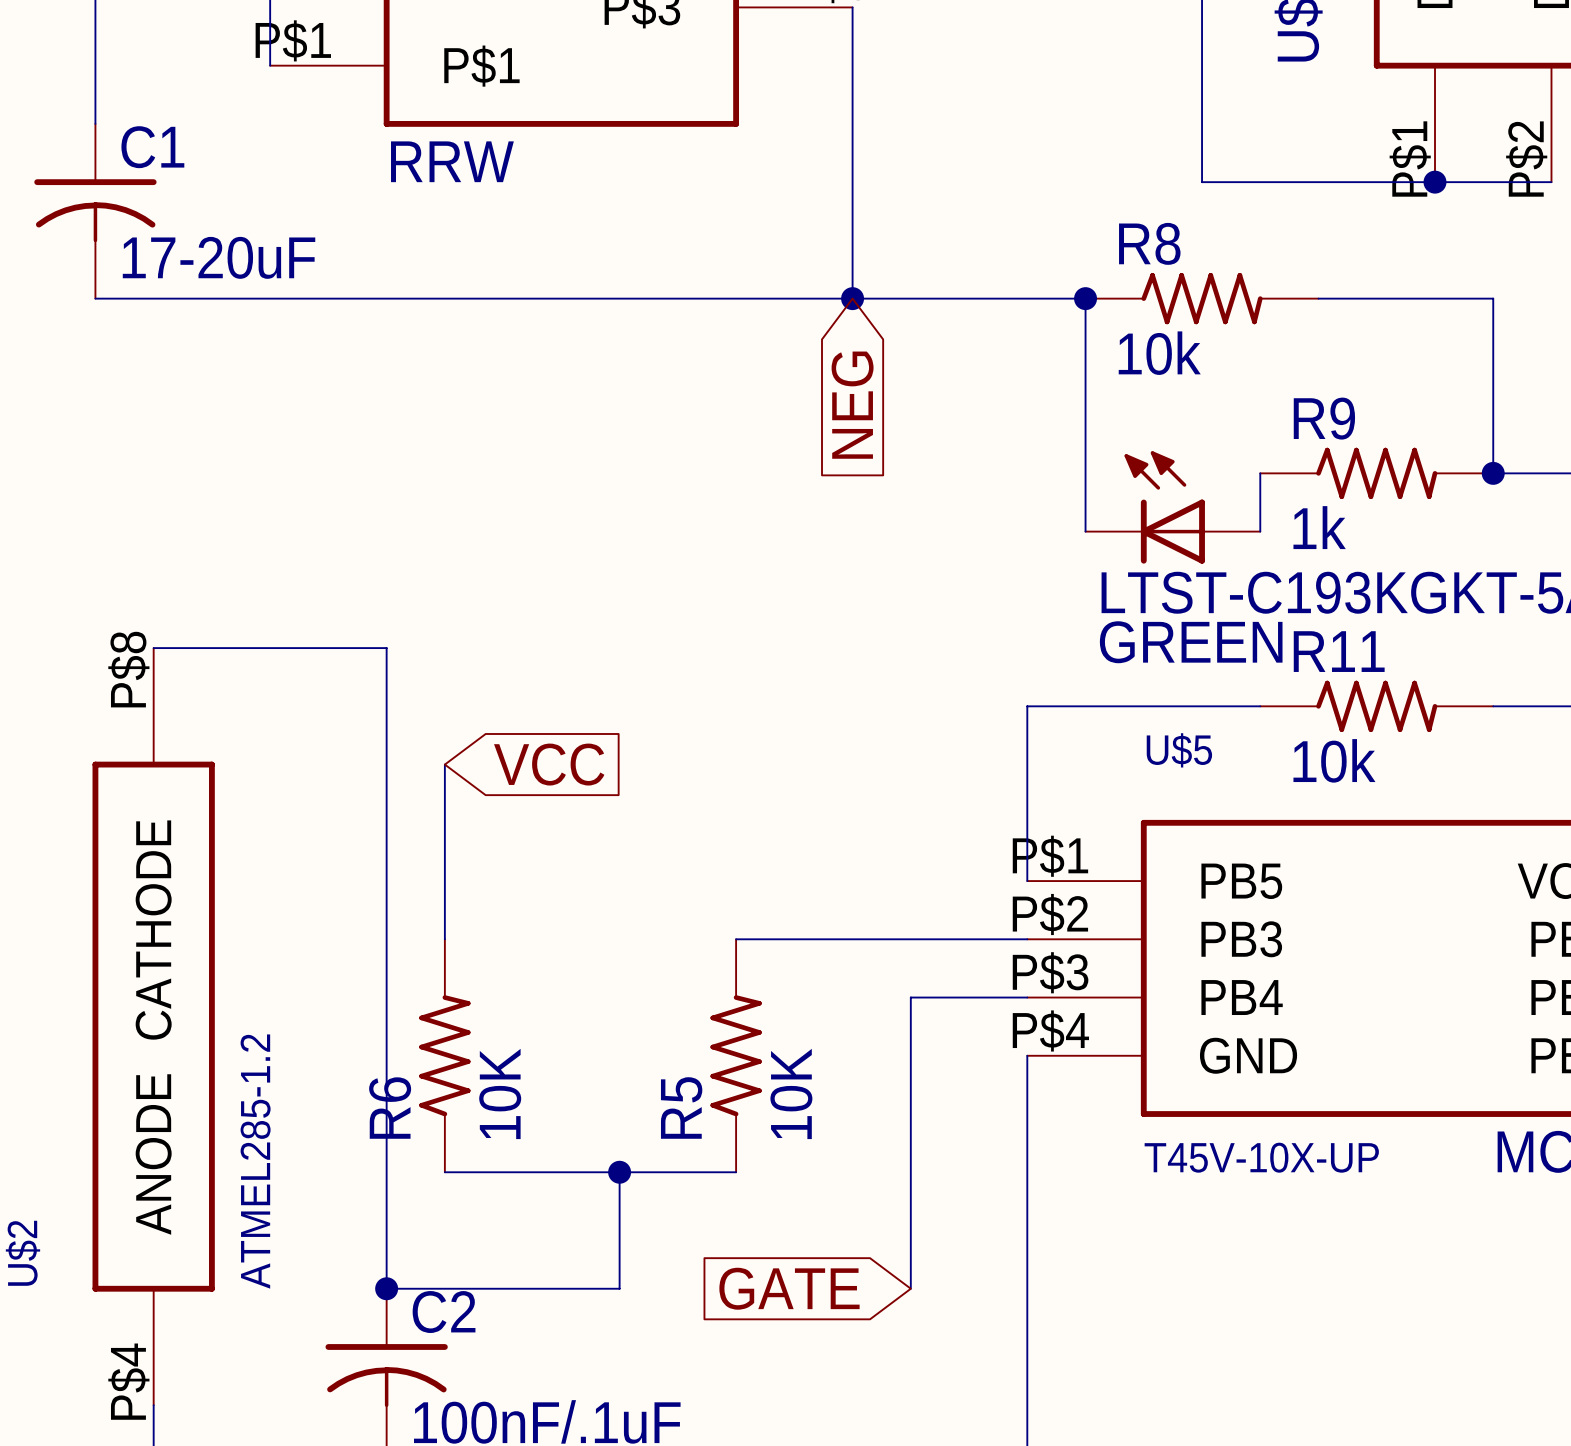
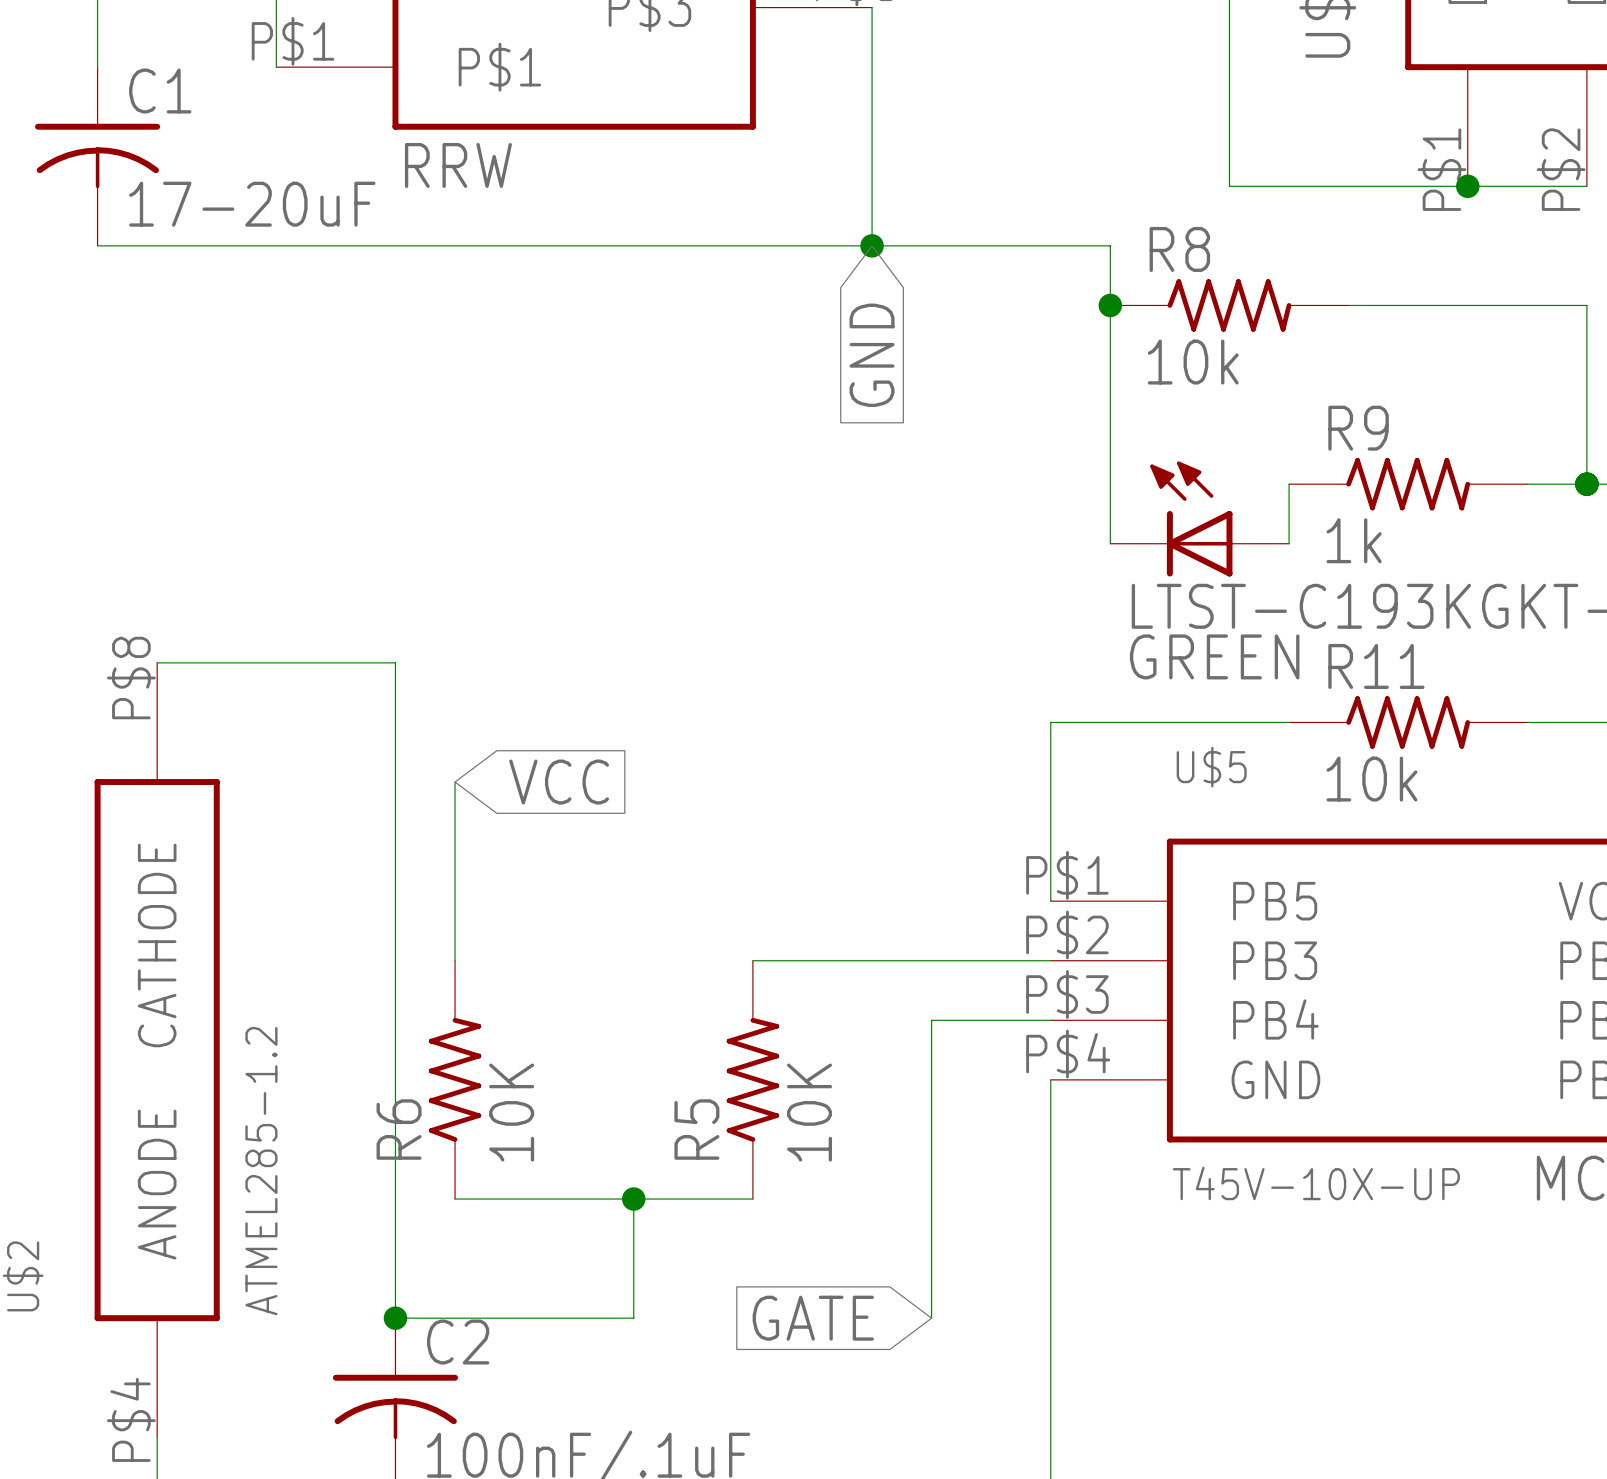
C1 position: (95, 211) -> (97, 156)
wire: (852, 240) (852, 298) -> none
wire: (95, 298) (1085, 298) -> (97, 245) (1110, 245) (1110, 305)
junction position: (852, 298) -> (872, 245)
wire: (1493, 298) (1493, 473) -> (1527, 305) (1586, 305) (1586, 484)
global label: none -> GND (872, 355)
global label: NEG (852, 405) -> none
junction position: (1493, 473) -> (1586, 484)

